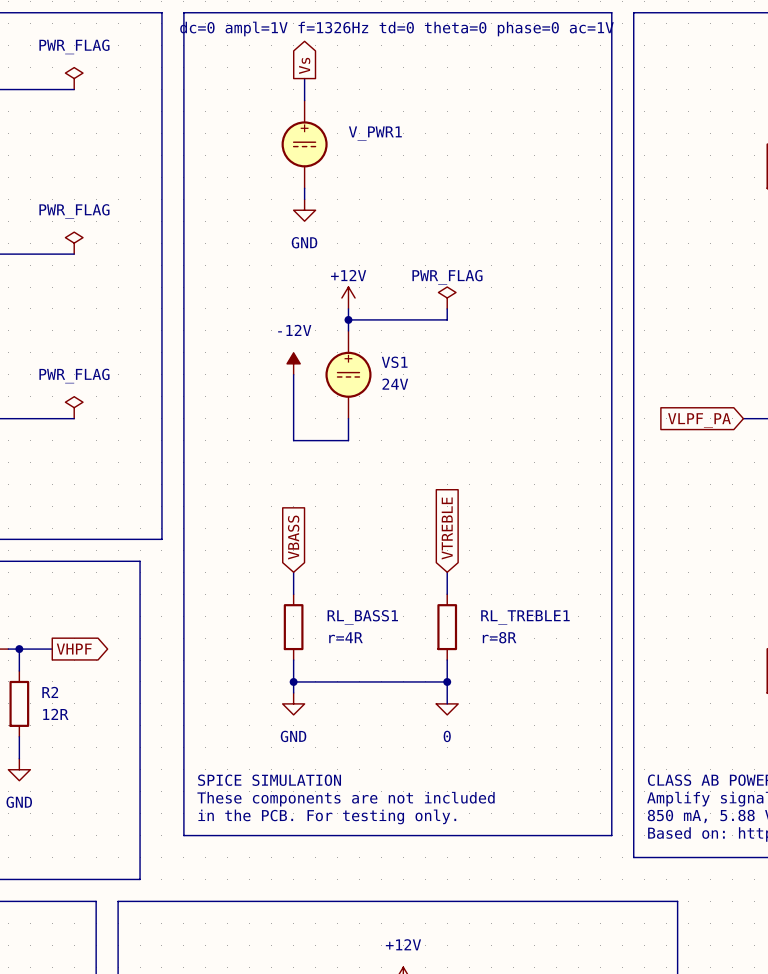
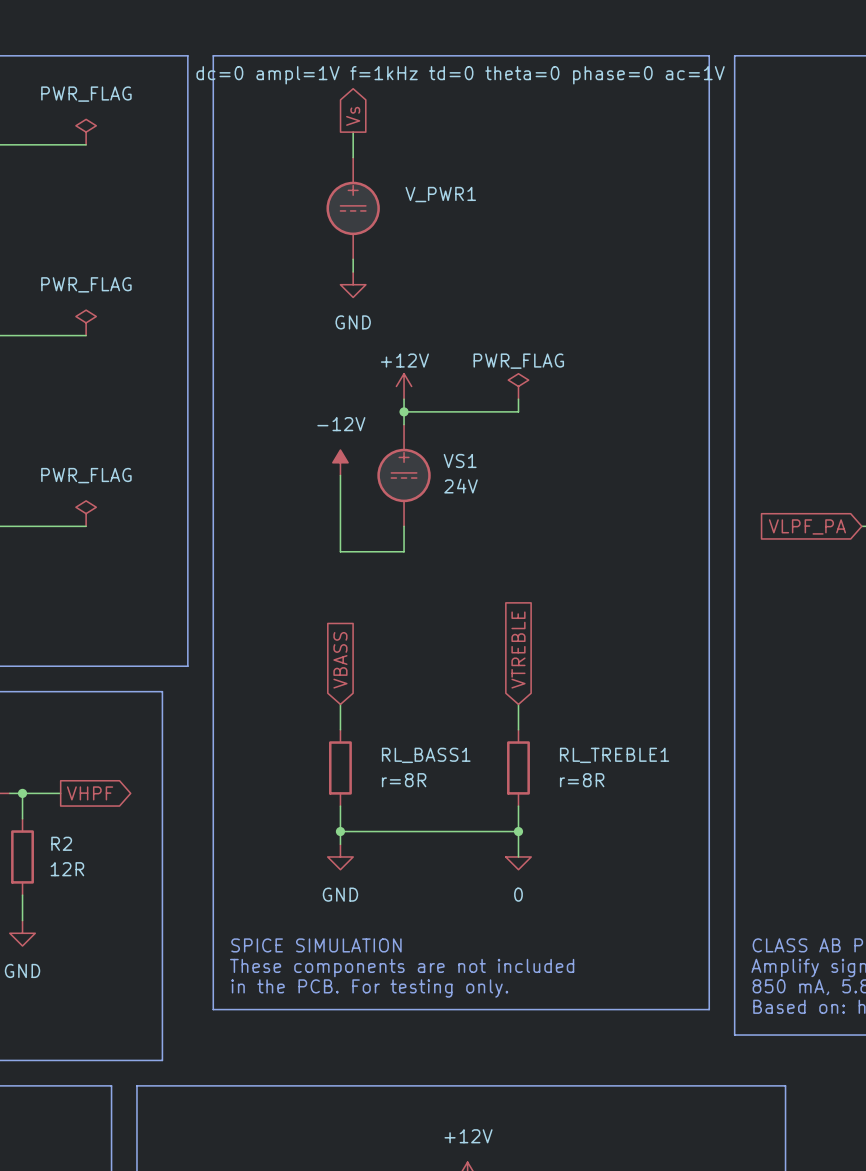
V_PWR1 text: dc=0 ampl=1V f=1326Hz td=0 theta=0 phase=0 ac=1V (396, 28) -> dc=0 ampl=1V f=1kHz td=0 theta=0 phase=0 ac=1V (460, 75)
RL_BASS1 value: r=4R (345, 637) -> r=8R (404, 780)

